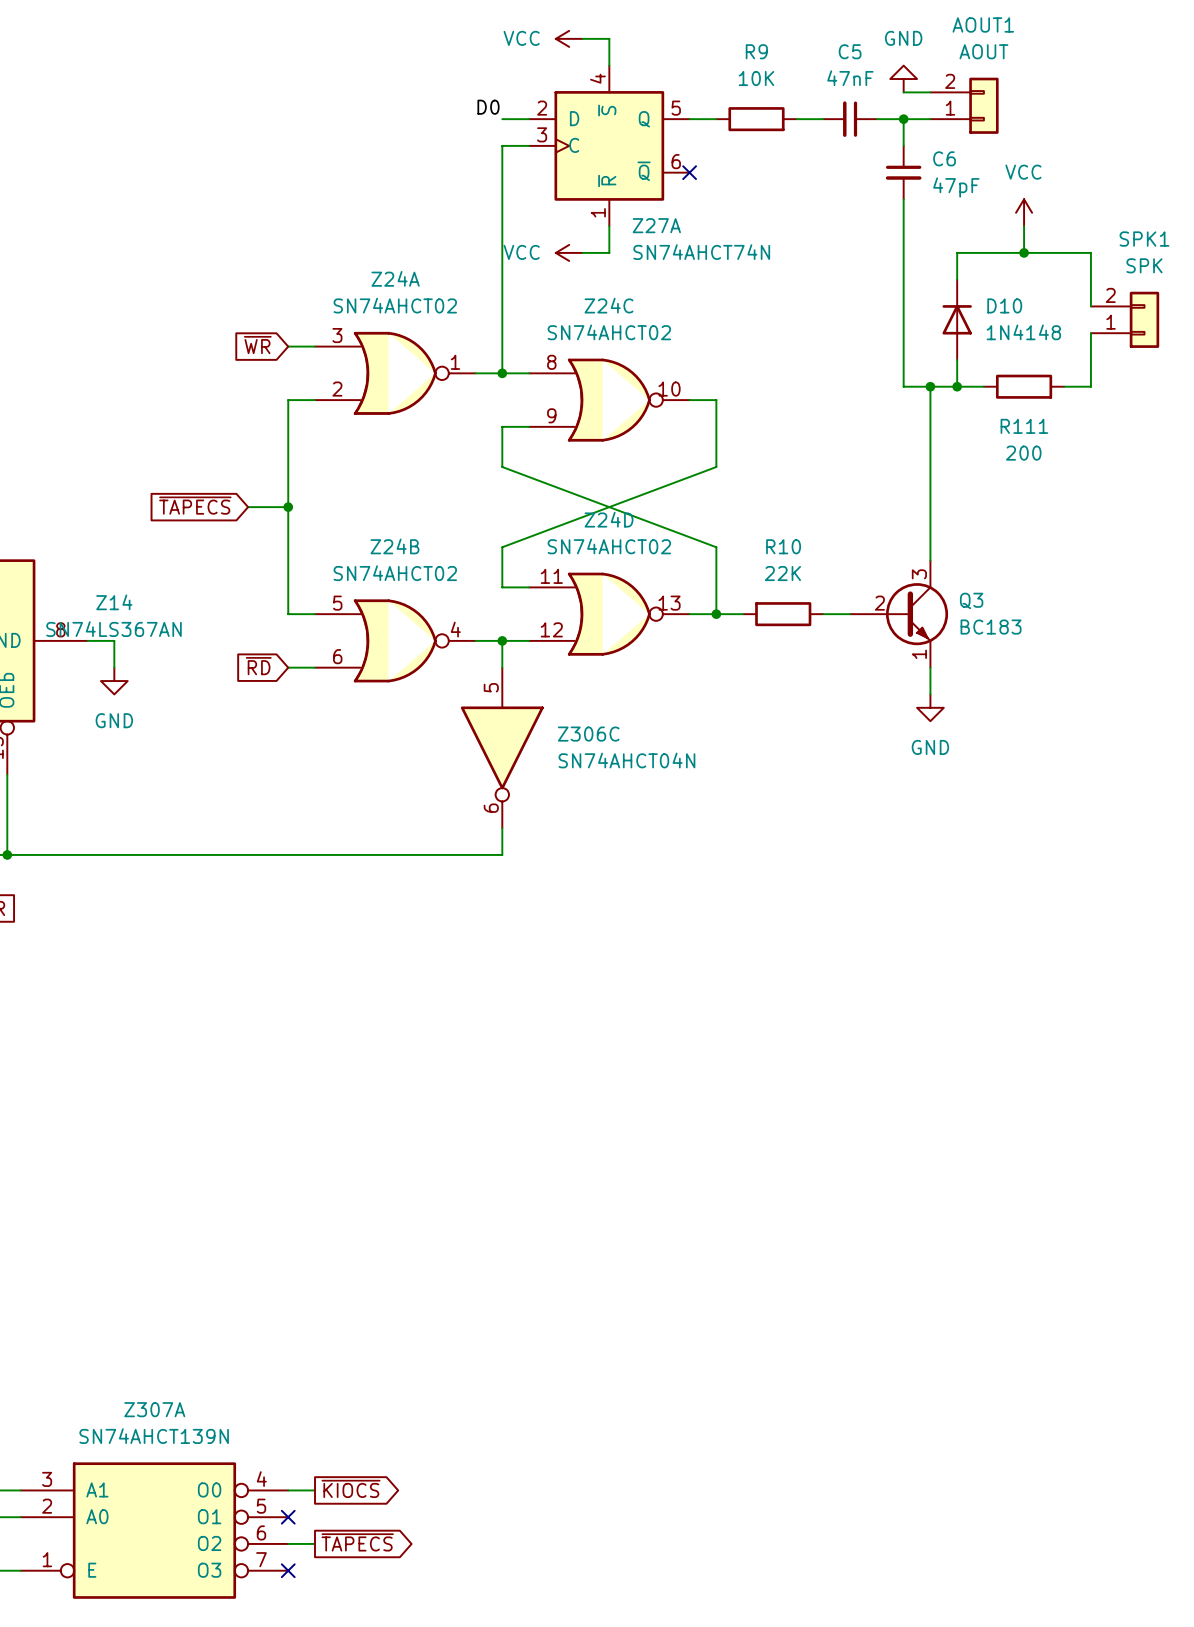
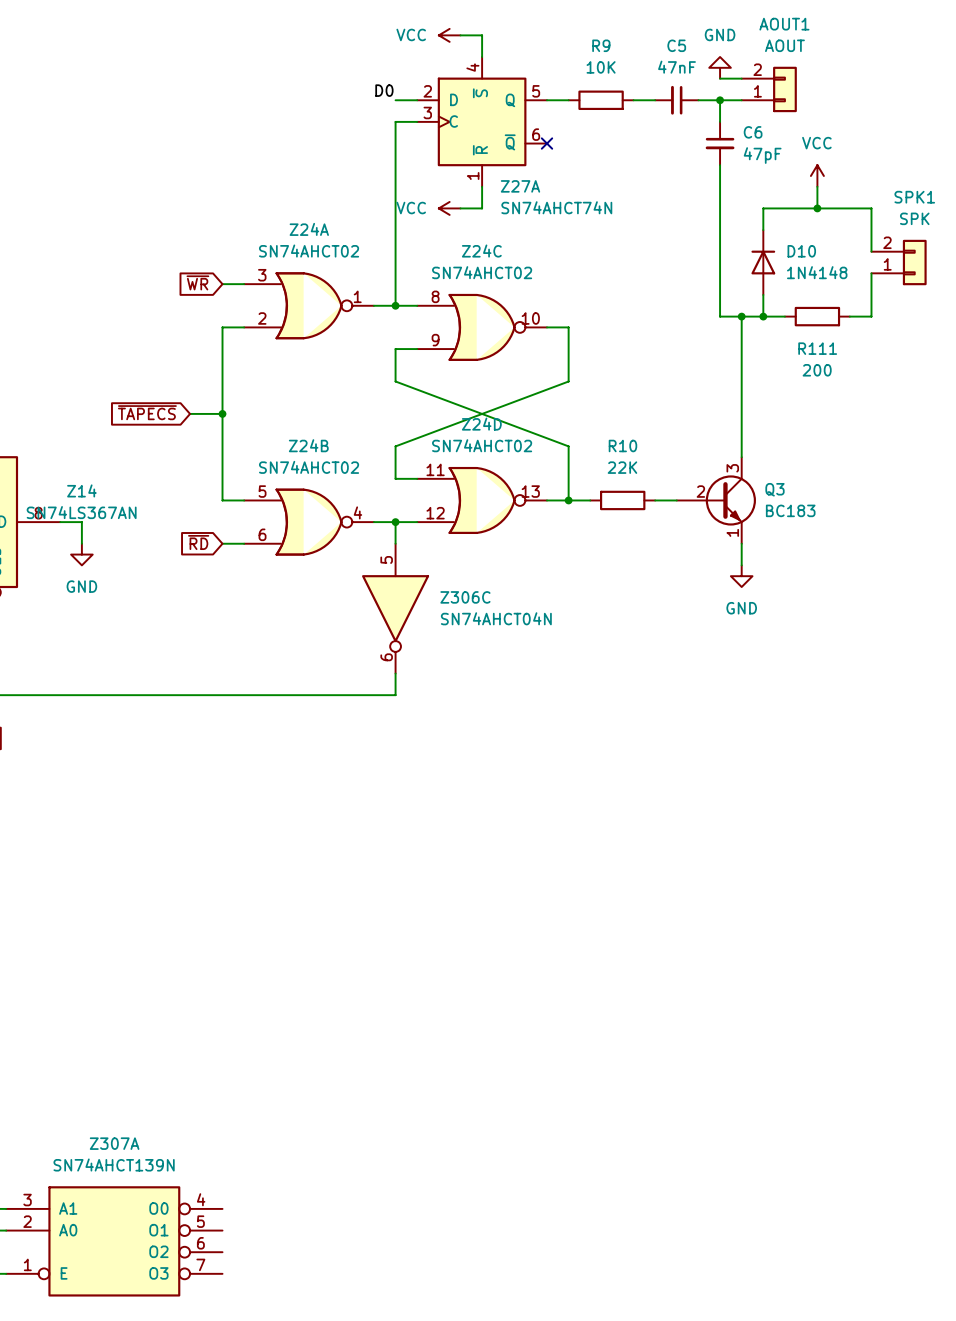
global label: ~{KIOCS} (351, 1488) -> none
wire: (288, 1490) (315, 1490) -> none
no-connect mark: (288, 1517) -> none
global label: ~{TAPECS} (357, 1542) -> none
wire: (288, 1543) (315, 1543) -> none
no-connect mark: (288, 1570) -> none

